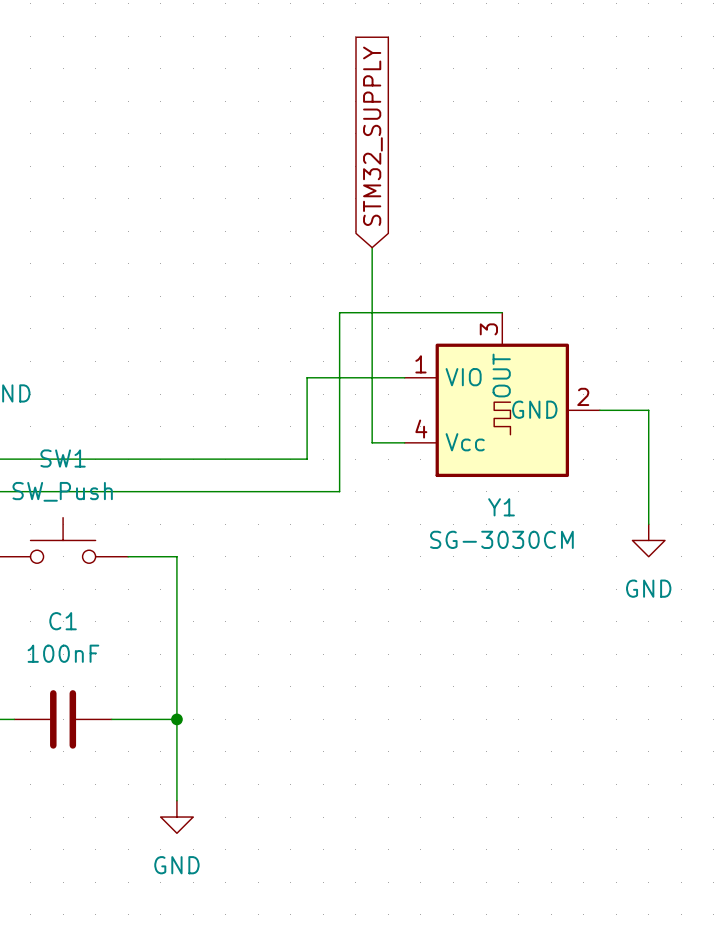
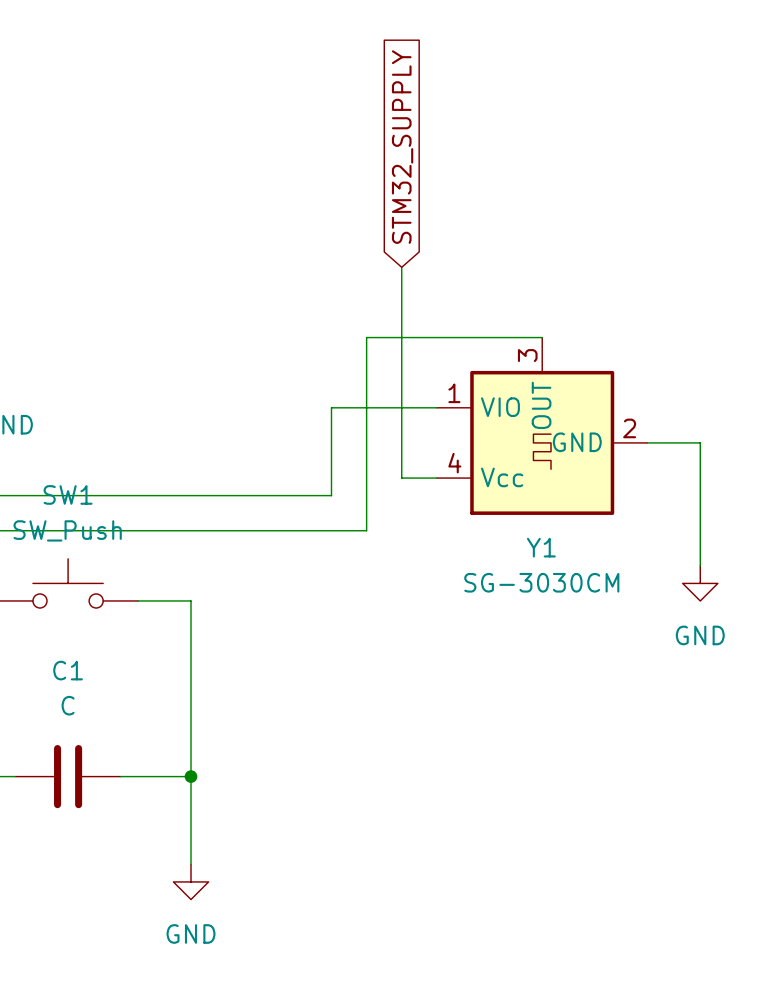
C1 value: 100nF (63, 653) -> C (68, 705)

